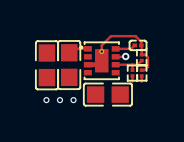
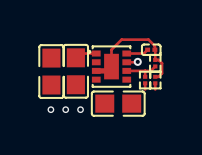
part footprint: [79, 41, 120, 81] -> [87, 45, 132, 88]

